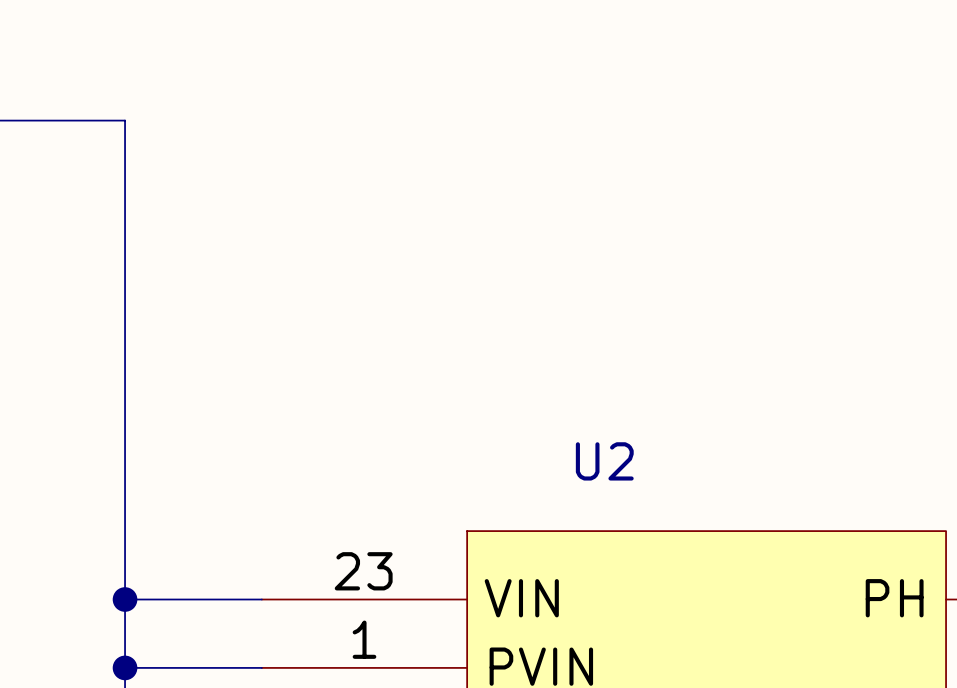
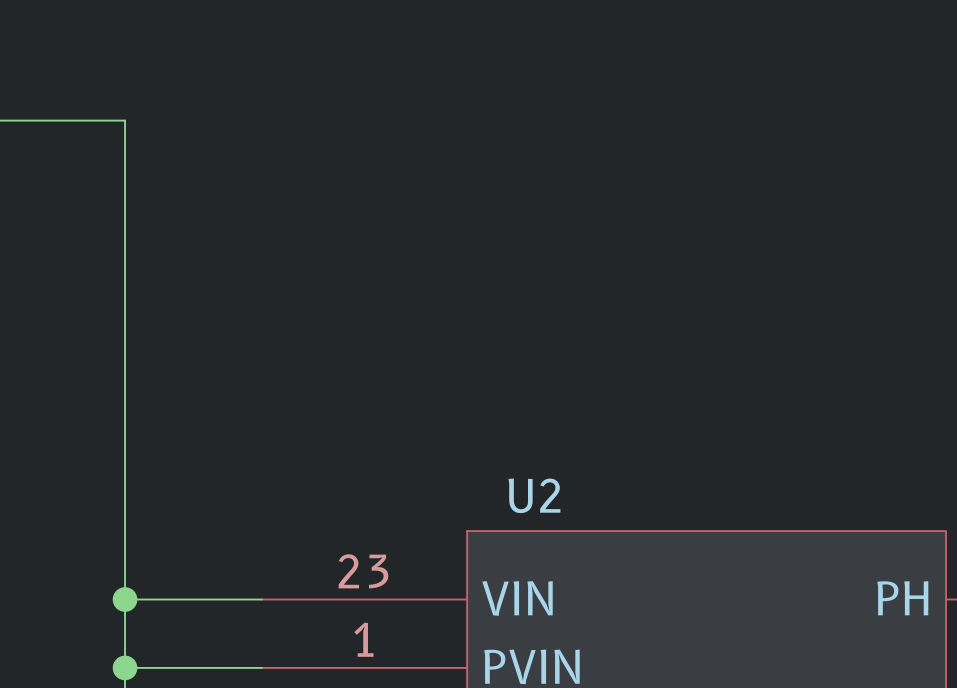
U2 name position: U2 (604, 461) -> U2 (534, 495)

